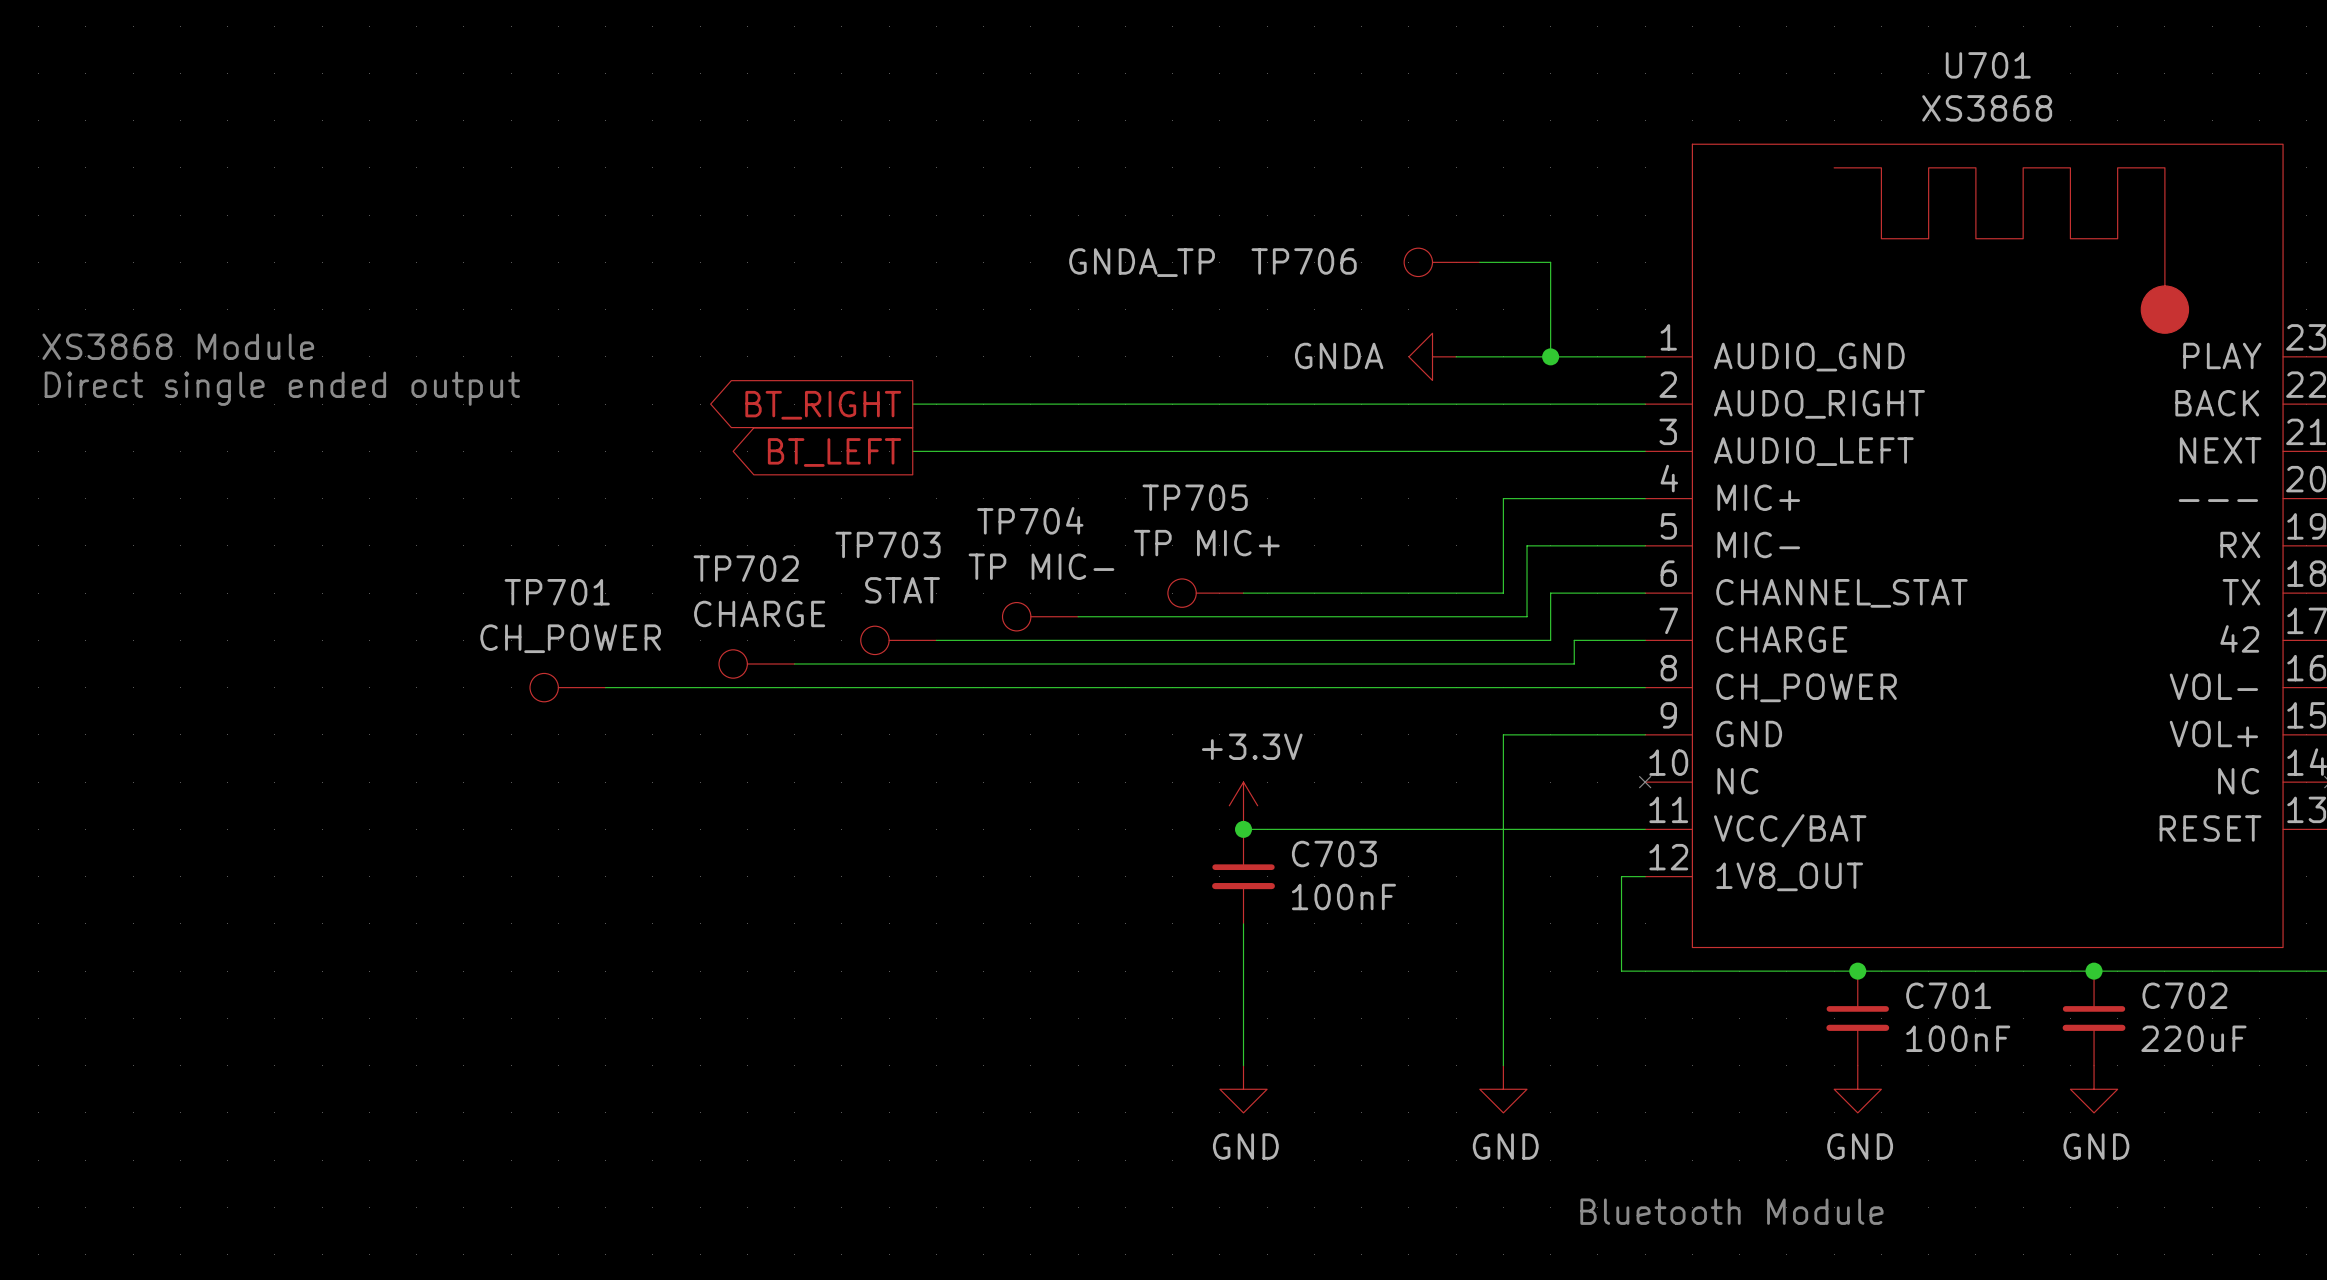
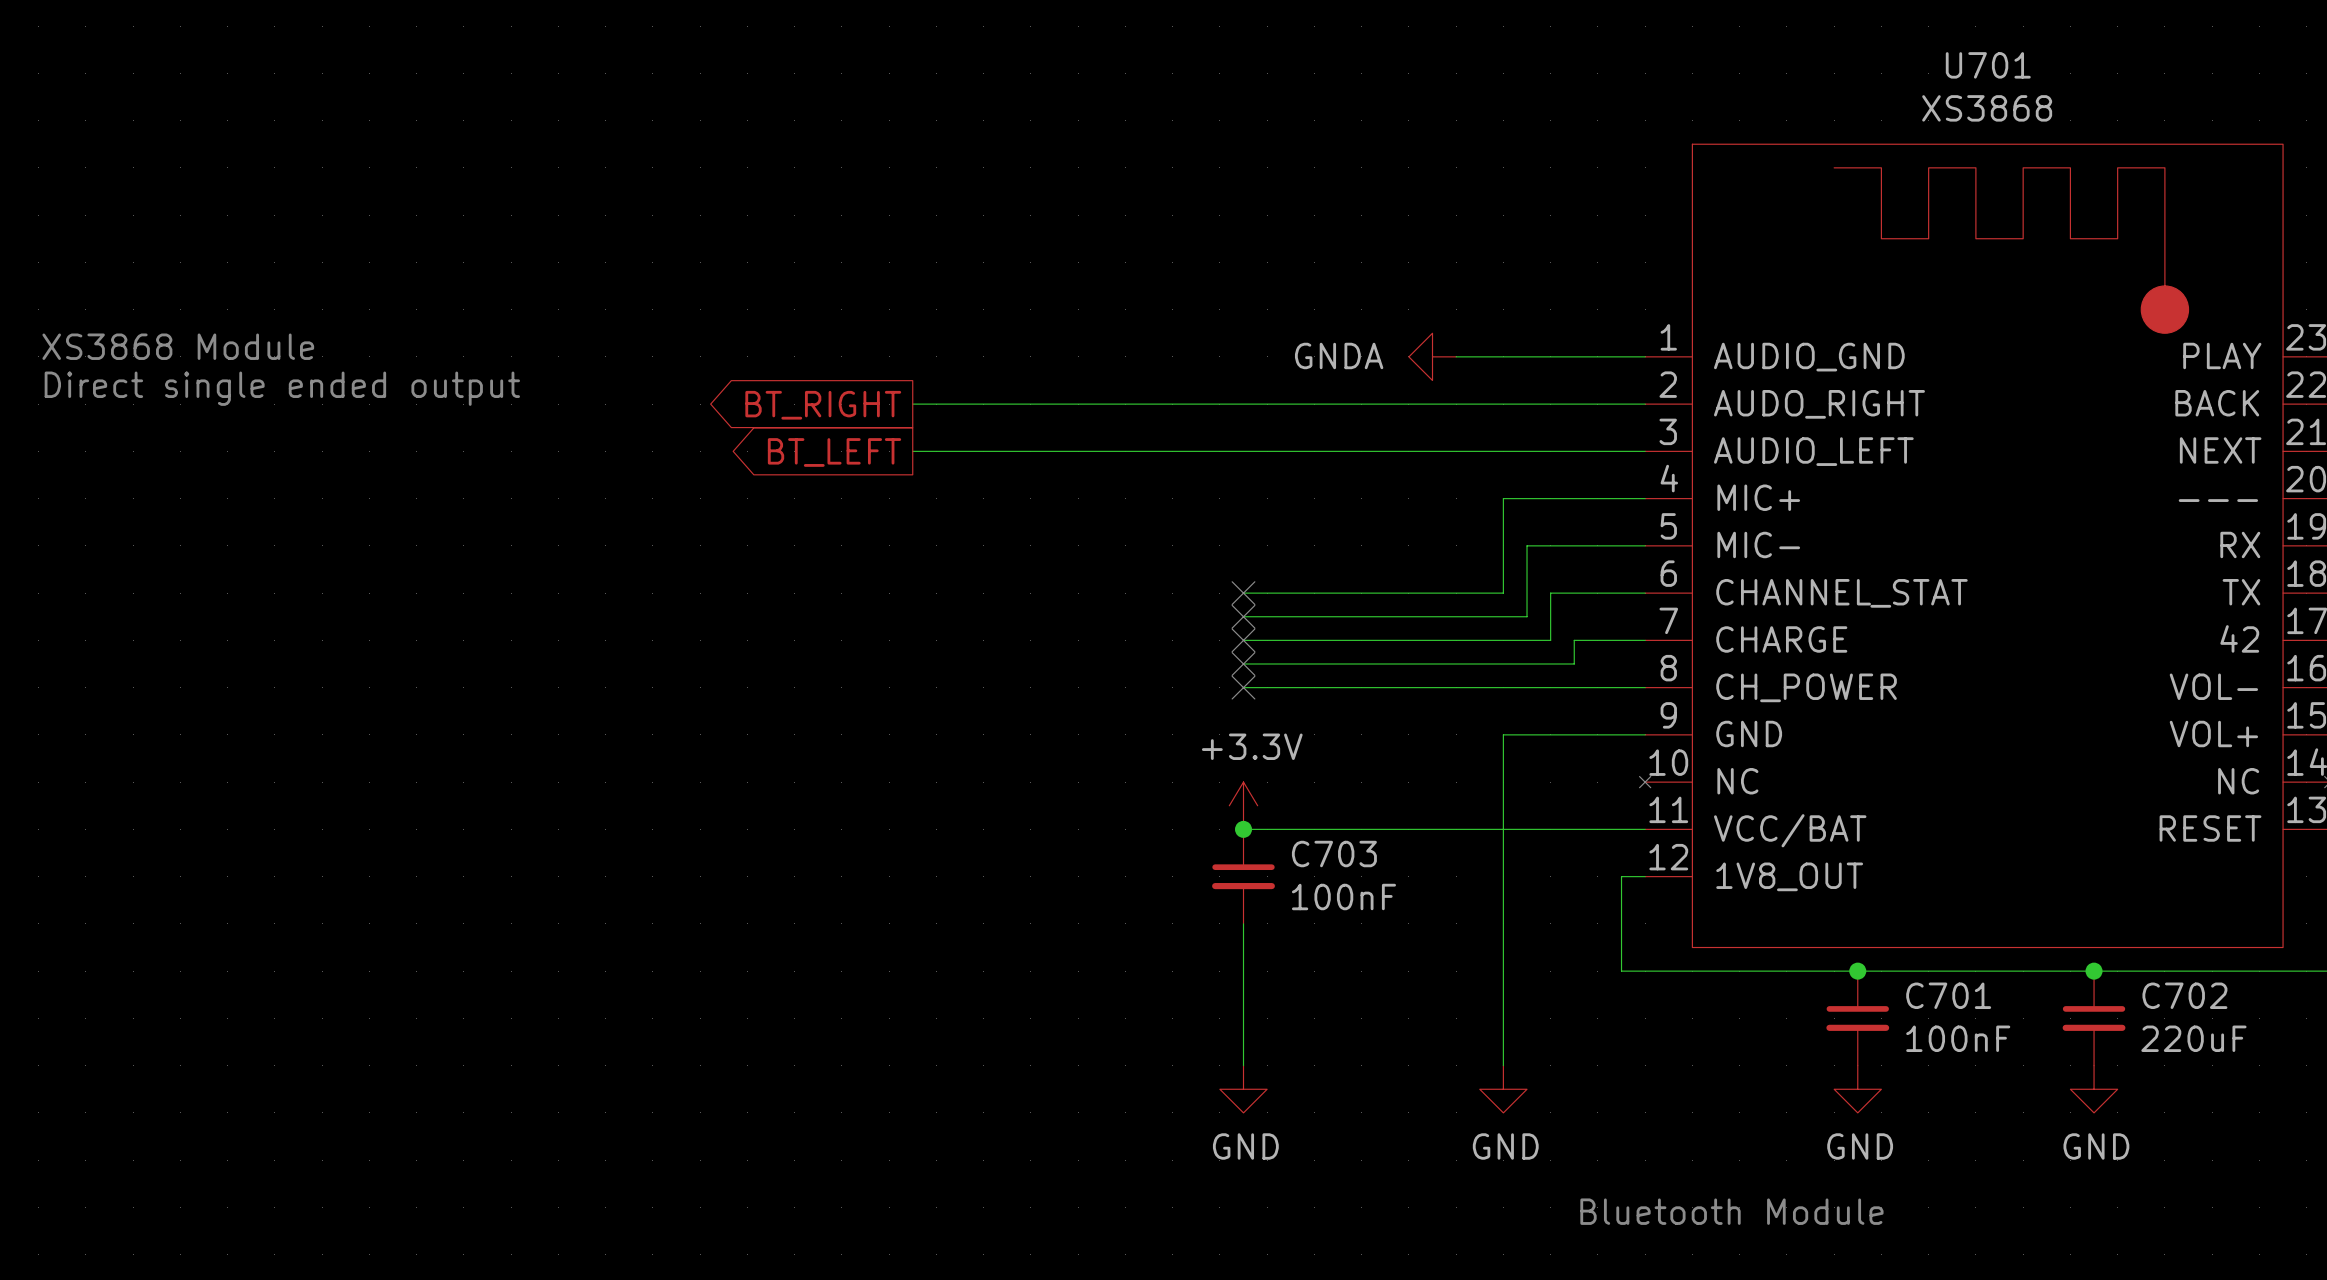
TP706: GNDA_TP (1441, 262) -> none
wire: (1479, 262) (1550, 262) (1550, 356) -> none
junction: (1550, 356) -> none
TP705: TP MIC+ (1205, 593) -> none
no-connect mark: none -> (1243, 593)
TP704: TP MIC- (1040, 616) -> none
wire: (1078, 616) (1243, 616) -> none
no-connect mark: none -> (1243, 616)
TP703: STAT (898, 640) -> none
wire: (936, 640) (1243, 640) -> none
no-connect mark: none -> (1243, 640)
TP702: CHARGE (756, 664) -> none
wire: (794, 664) (1243, 664) -> none
no-connect mark: none -> (1243, 664)
TP701: CH_POWER (567, 687) -> none
wire: (605, 687) (1243, 687) -> none
no-connect mark: none -> (1243, 687)

